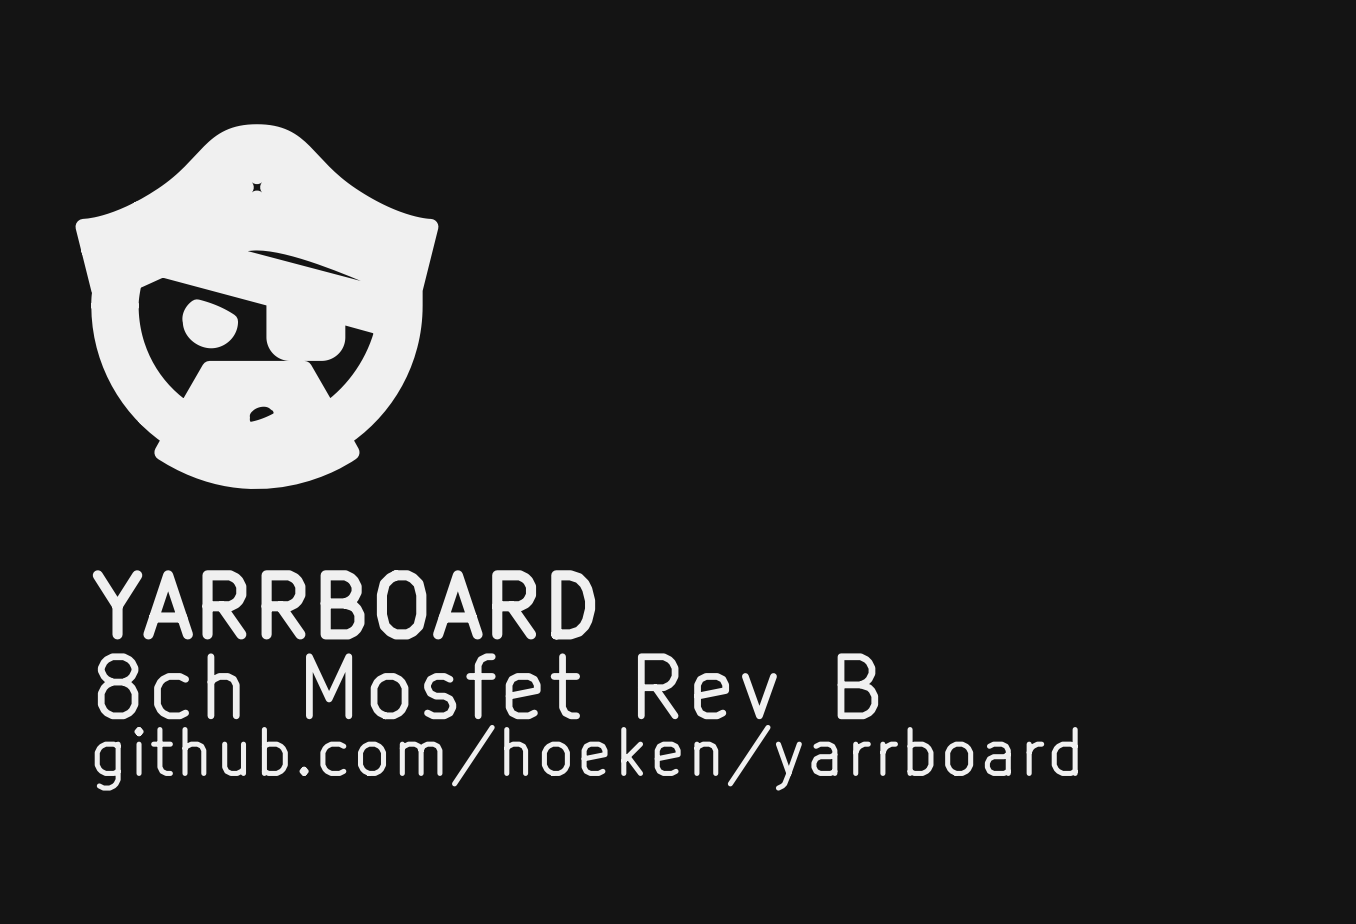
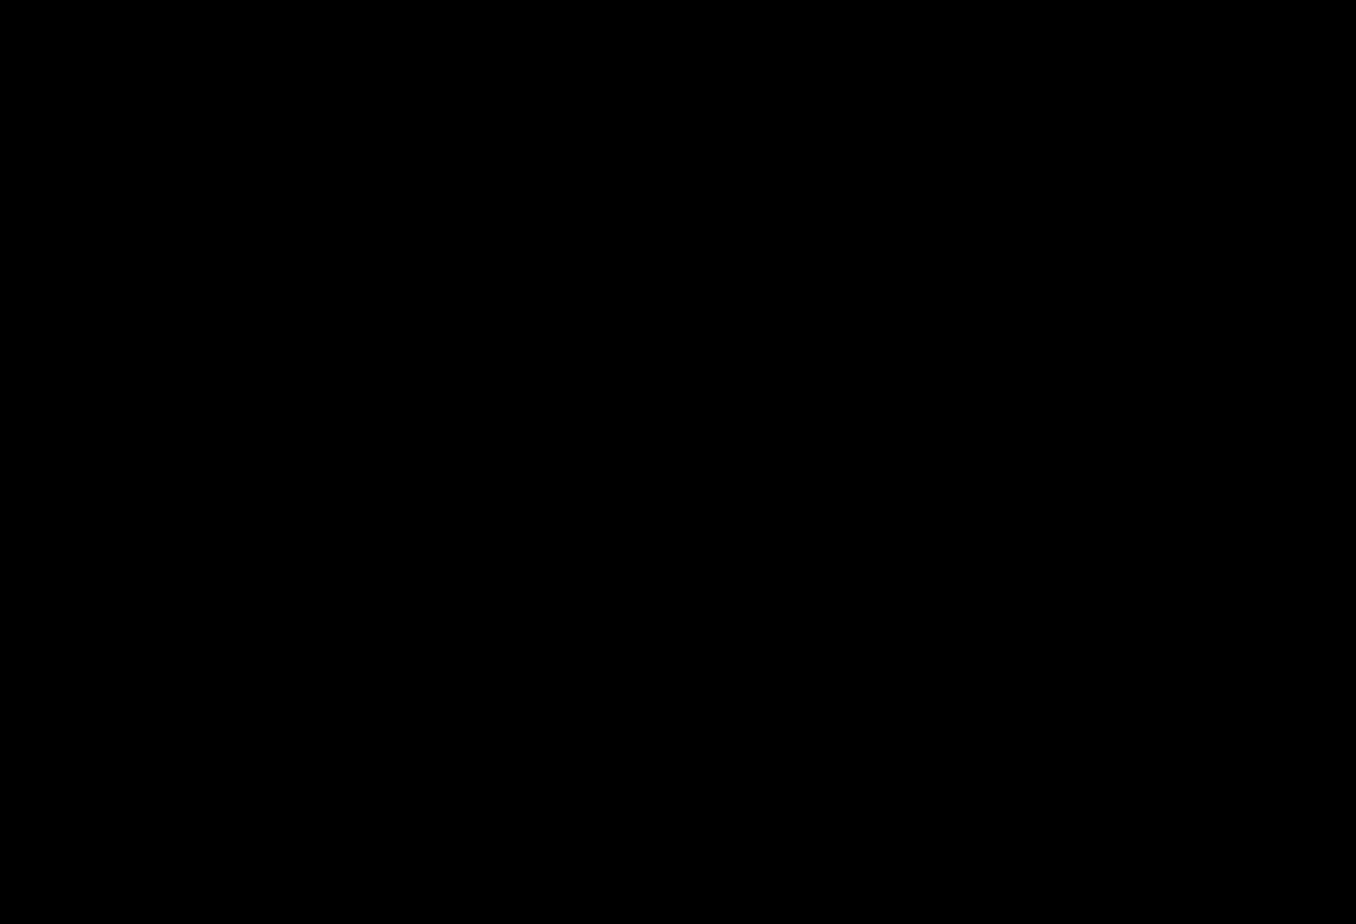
drawing: [75, 124, 439, 489] -> none
text: YARRBOARD (343, 604) -> none
text: 8ch Mosfet Rev B (488, 686) -> none
text: github.com/hoeken/yarrboard (586, 757) -> none

